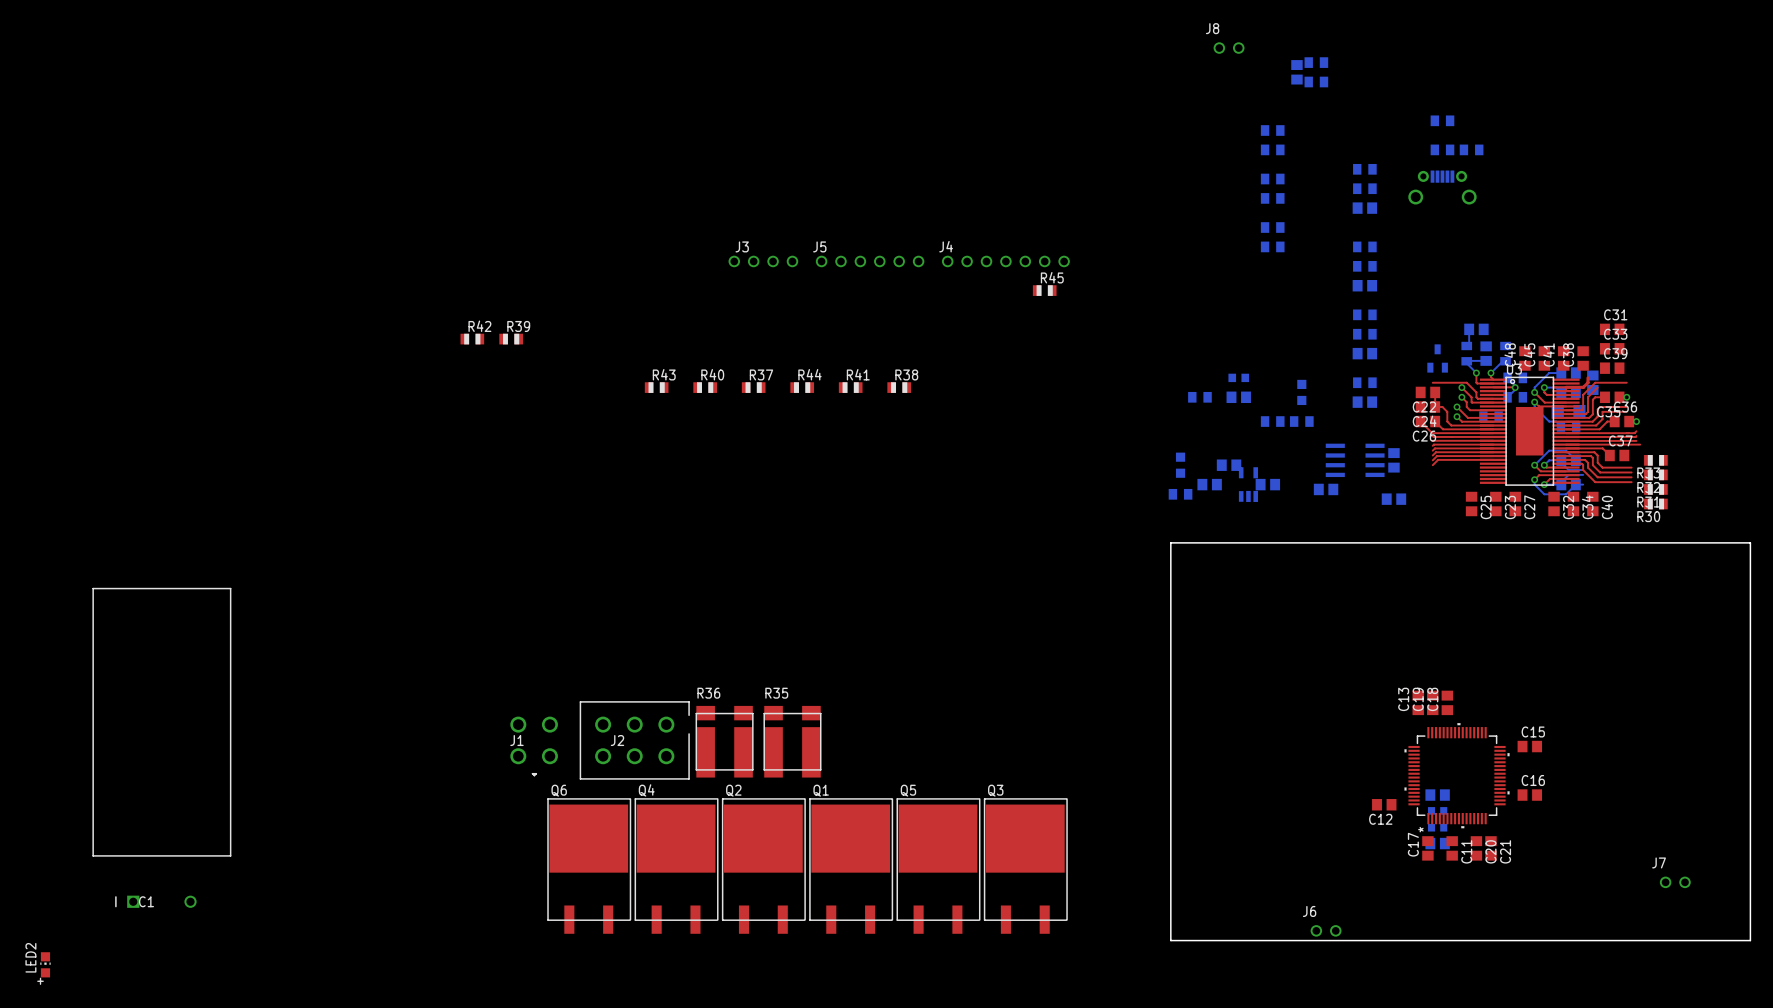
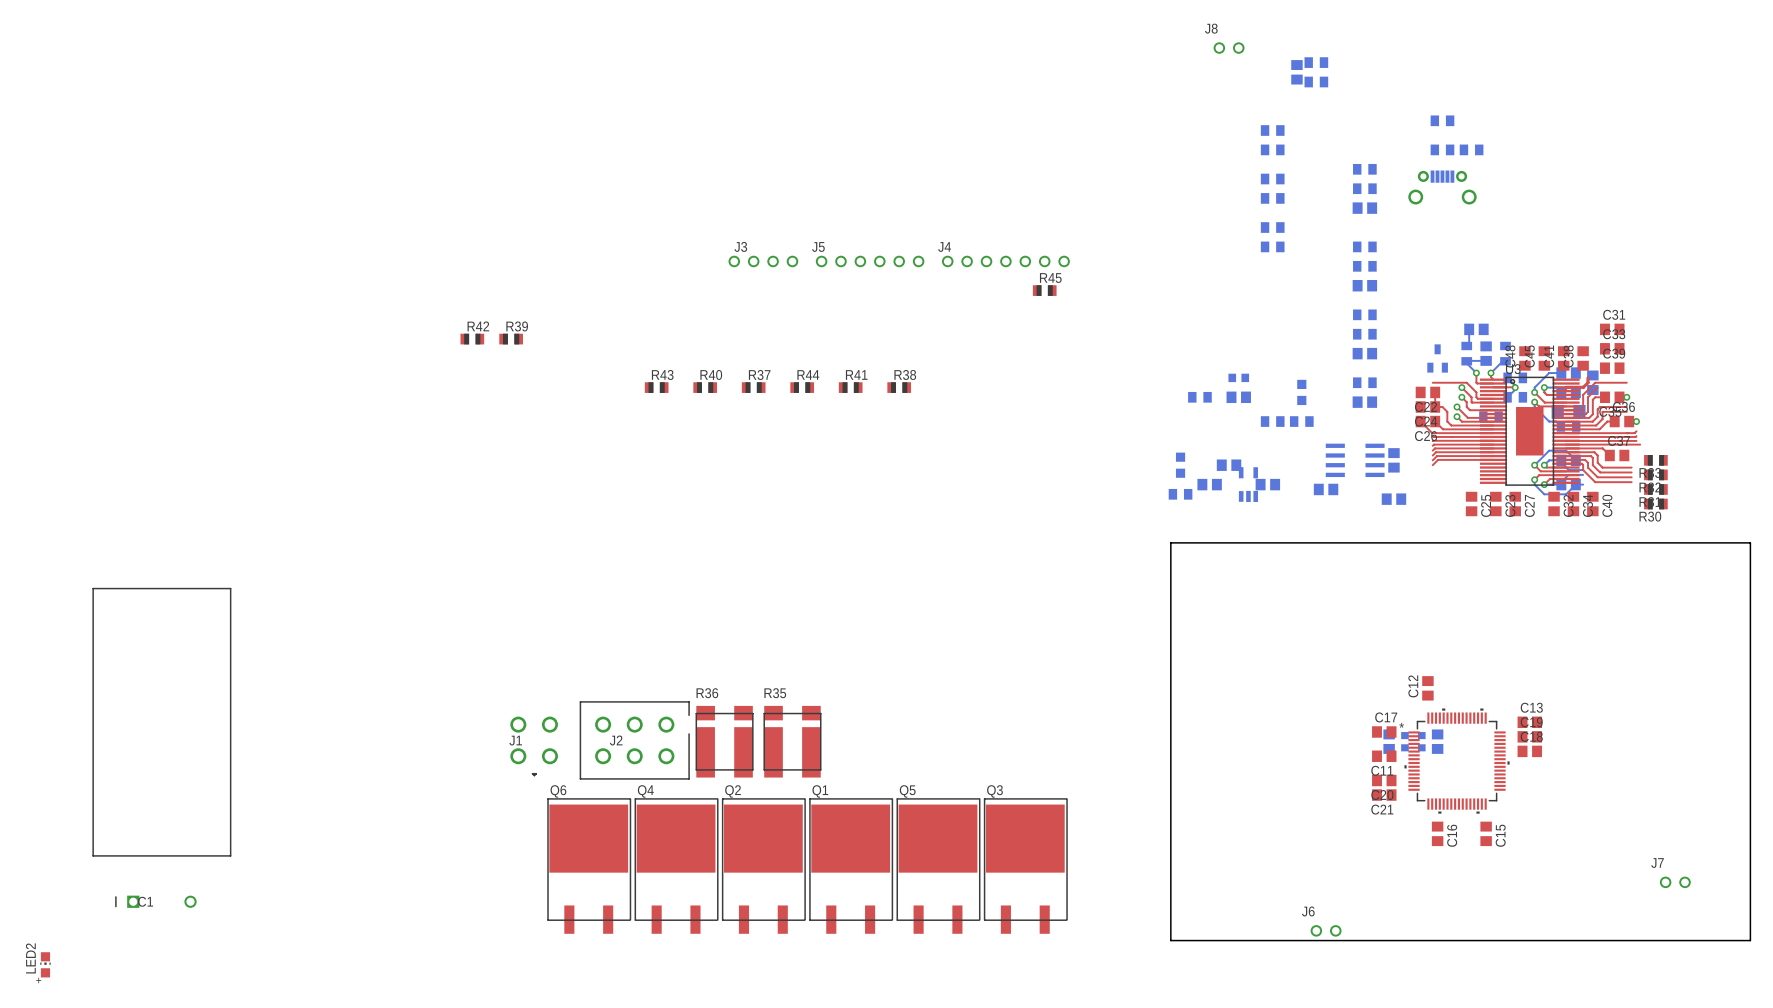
C13 rotation: 0° (1418, 702) -> 90° clockwise (1529, 722)
C13 position: (1418, 702) -> (1529, 722)
C19 rotation: 0° (1432, 702) -> 90° clockwise (1529, 736)
C19 position: (1432, 702) -> (1529, 736)
C18 rotation: 0° (1447, 702) -> 90° clockwise (1529, 751)
C18 position: (1447, 702) -> (1529, 751)
part: none -> (1389, 741)
part: none -> (1437, 741)
C15 rotation: 0° (1529, 746) -> 90° clockwise (1486, 833)
C15 position: (1529, 746) -> (1486, 833)
part rotation: 0° (1457, 775) -> 90° clockwise (1457, 761)
part: (1437, 795) -> none
C16 rotation: 0° (1529, 795) -> 90° clockwise (1437, 833)
C16 position: (1529, 795) -> (1437, 833)
C12 rotation: 0° (1384, 804) -> 90° clockwise (1427, 688)
C12 position: (1384, 804) -> (1427, 688)
part rotation: 0° (1437, 819) -> 90° clockwise (1413, 741)
part position: (1437, 819) -> (1413, 741)
part: (1437, 843) -> none
C17 rotation: 0° (1427, 848) -> 90° clockwise (1384, 731)
C17 position: (1427, 848) -> (1384, 731)
C11 rotation: 0° (1452, 848) -> 90° clockwise (1384, 756)
C11 position: (1452, 848) -> (1384, 756)
C20 rotation: 0° (1476, 848) -> 90° clockwise (1384, 780)
C20 position: (1476, 848) -> (1384, 780)
C21 rotation: 0° (1490, 848) -> 90° clockwise (1384, 795)
C21 position: (1490, 848) -> (1384, 795)

